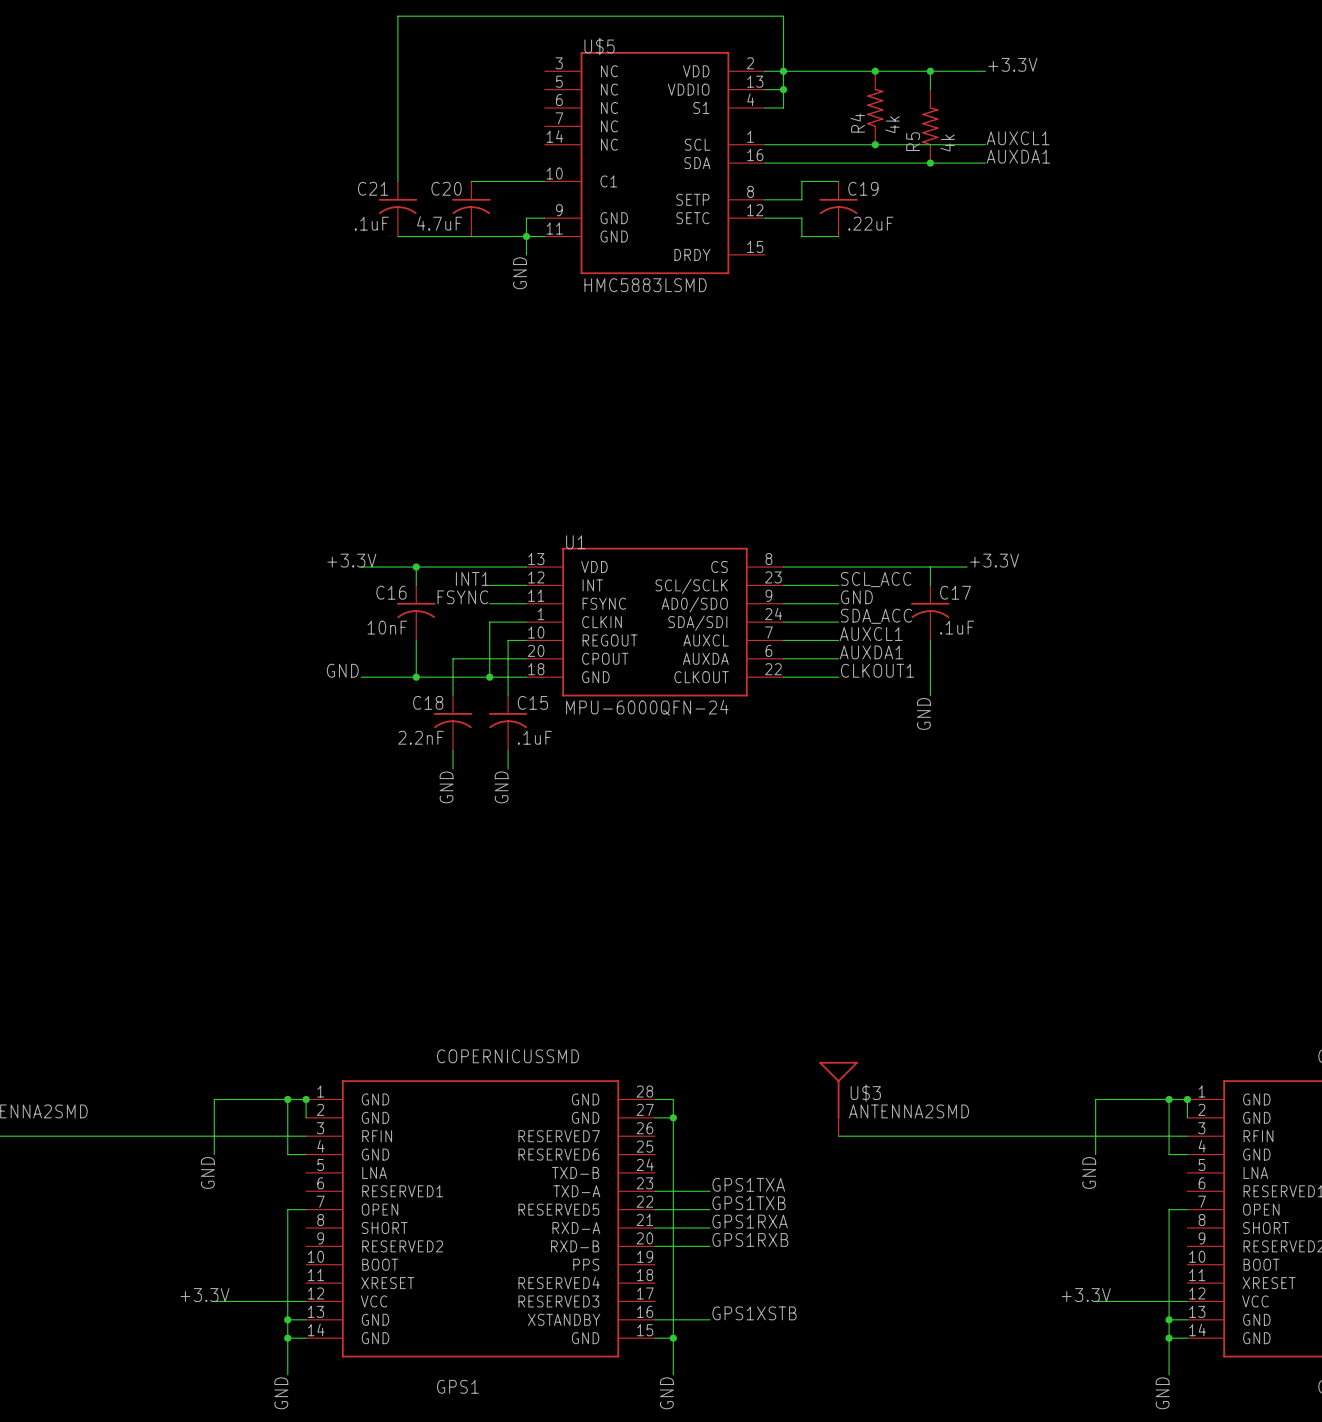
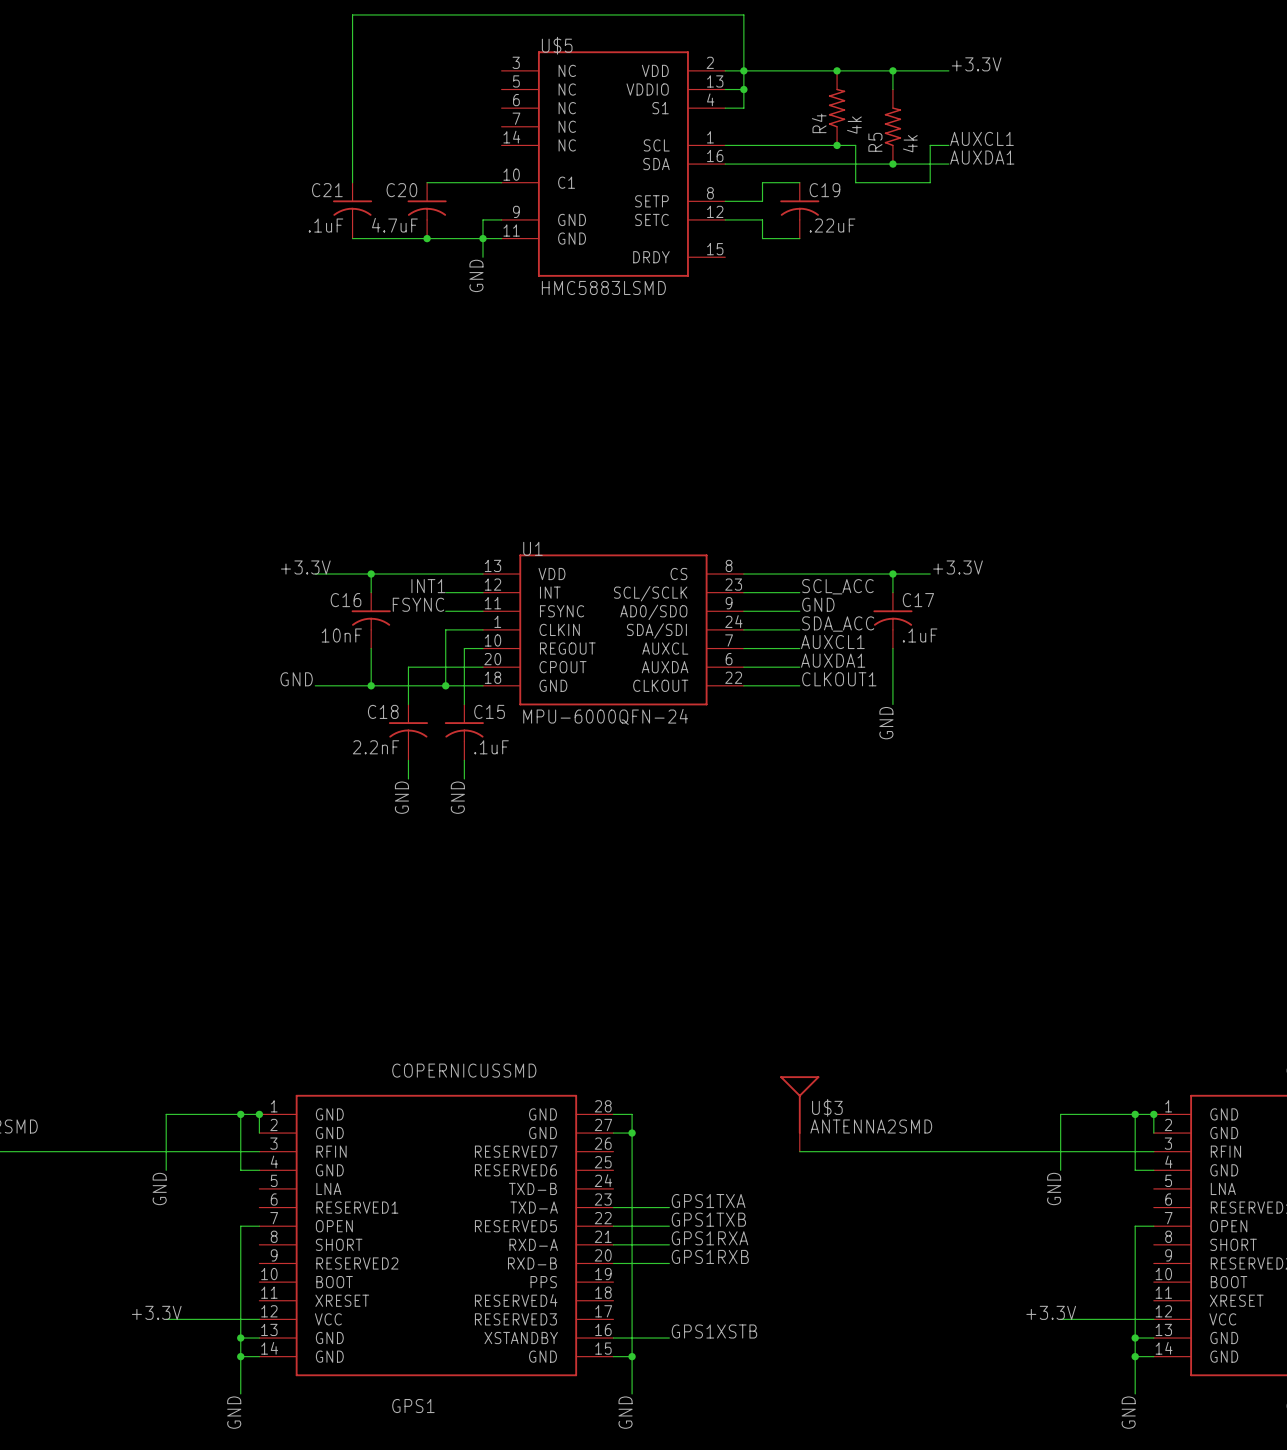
wire: (893, 144) (967, 144) -> (855, 145) (855, 182) (930, 182) (930, 145)
junction: none -> (427, 238)
junction: none -> (892, 574)

